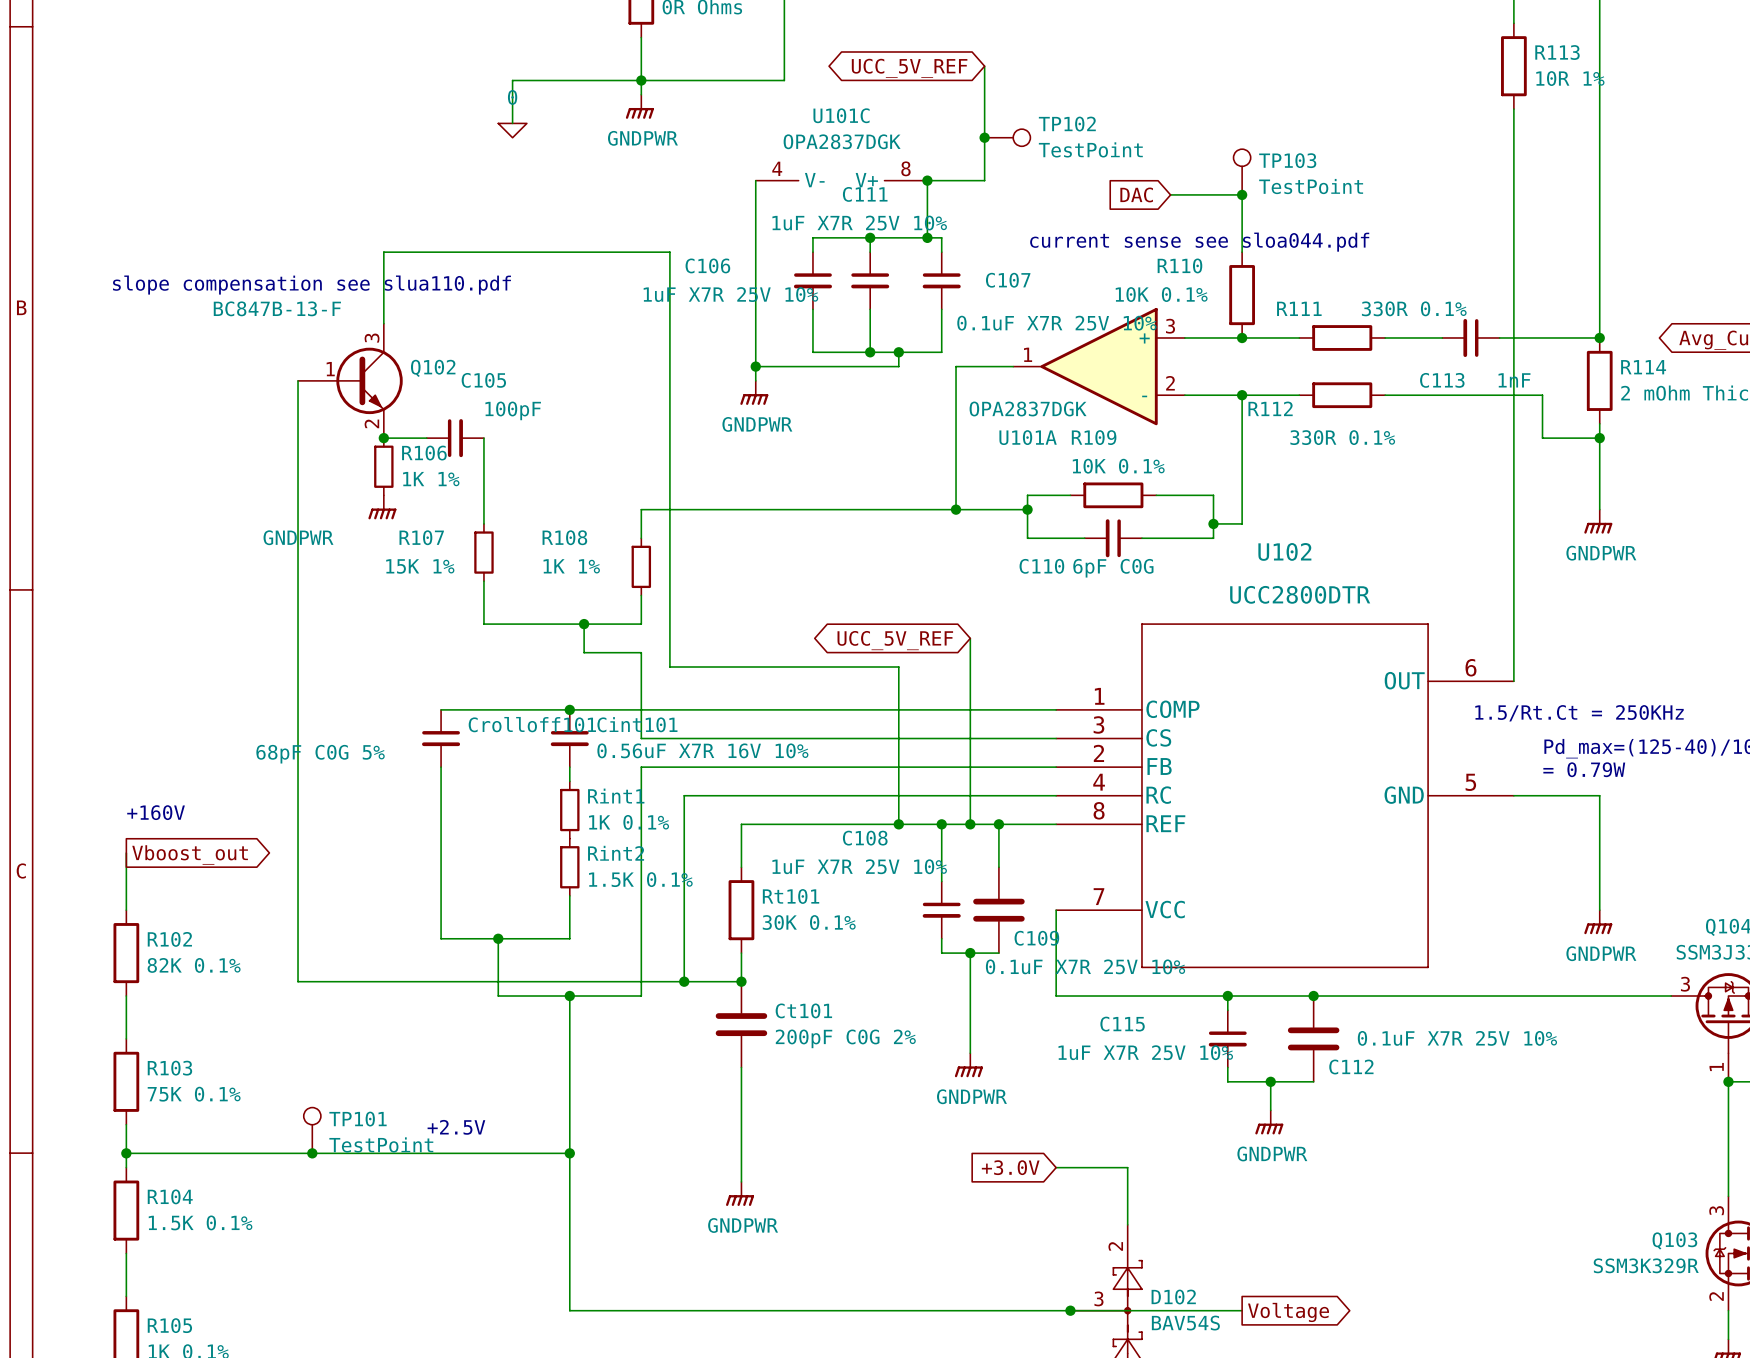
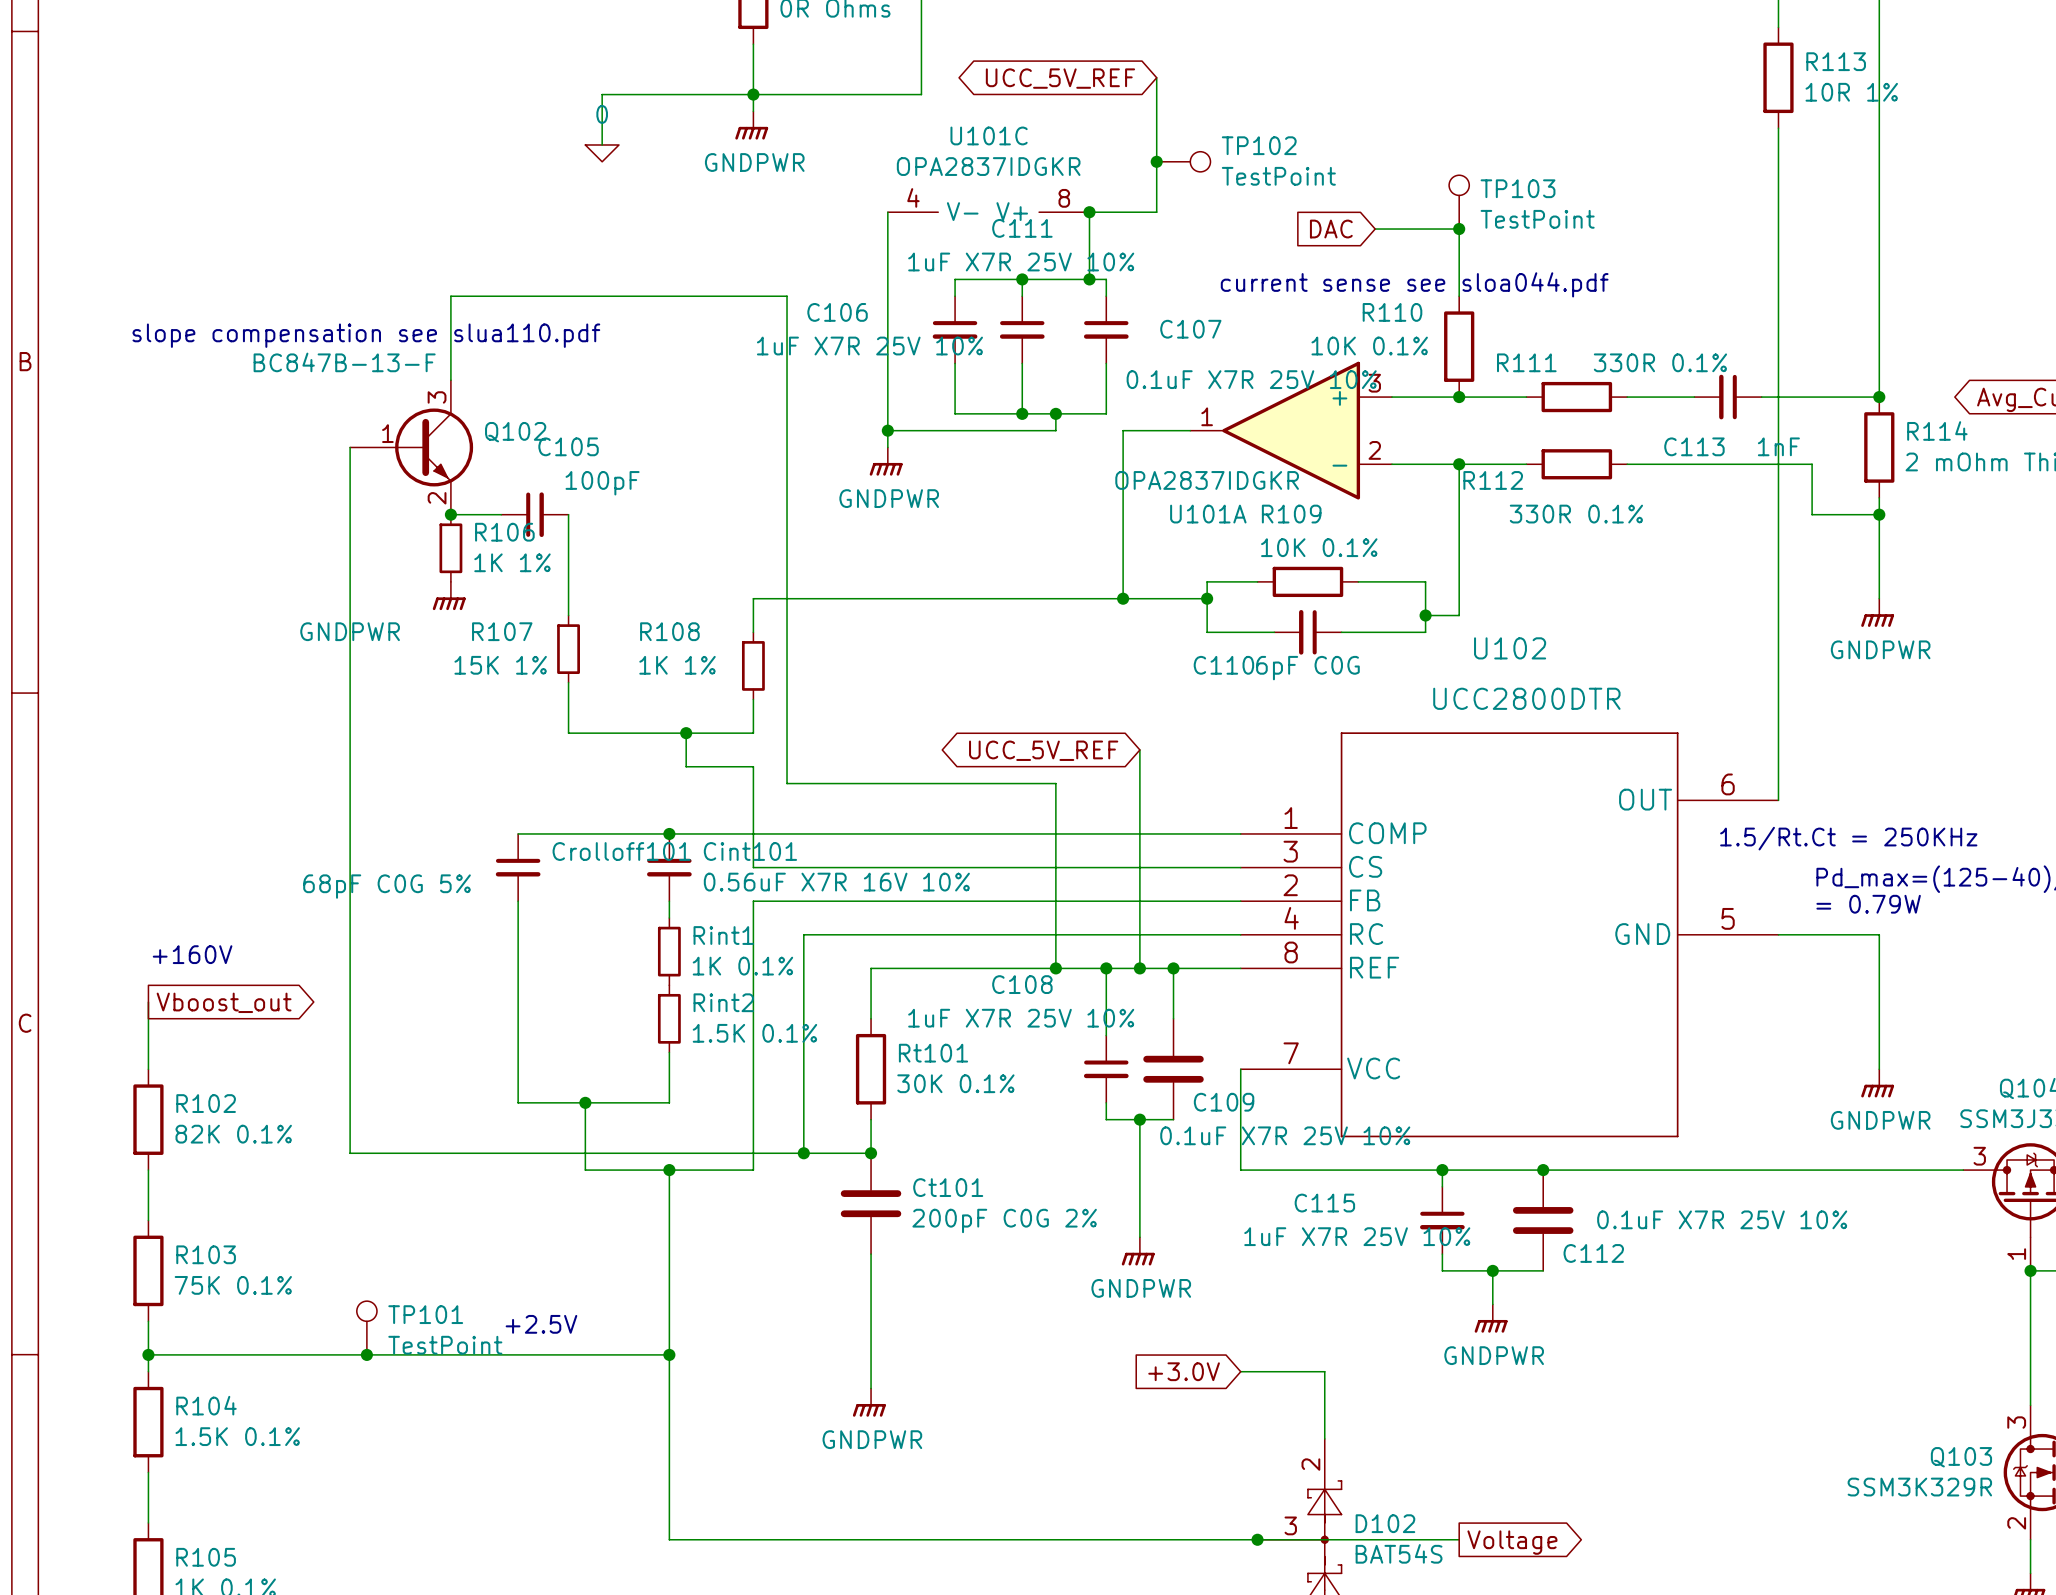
U101C value: OPA2837DGK (842, 141) -> OPA2837IDGKR (988, 166)
U101A value: OPA2837DGK (1028, 408) -> OPA2837IDGKR (1207, 480)
D102 value: BAV54S (1185, 1323) -> BAT54S (1399, 1553)

